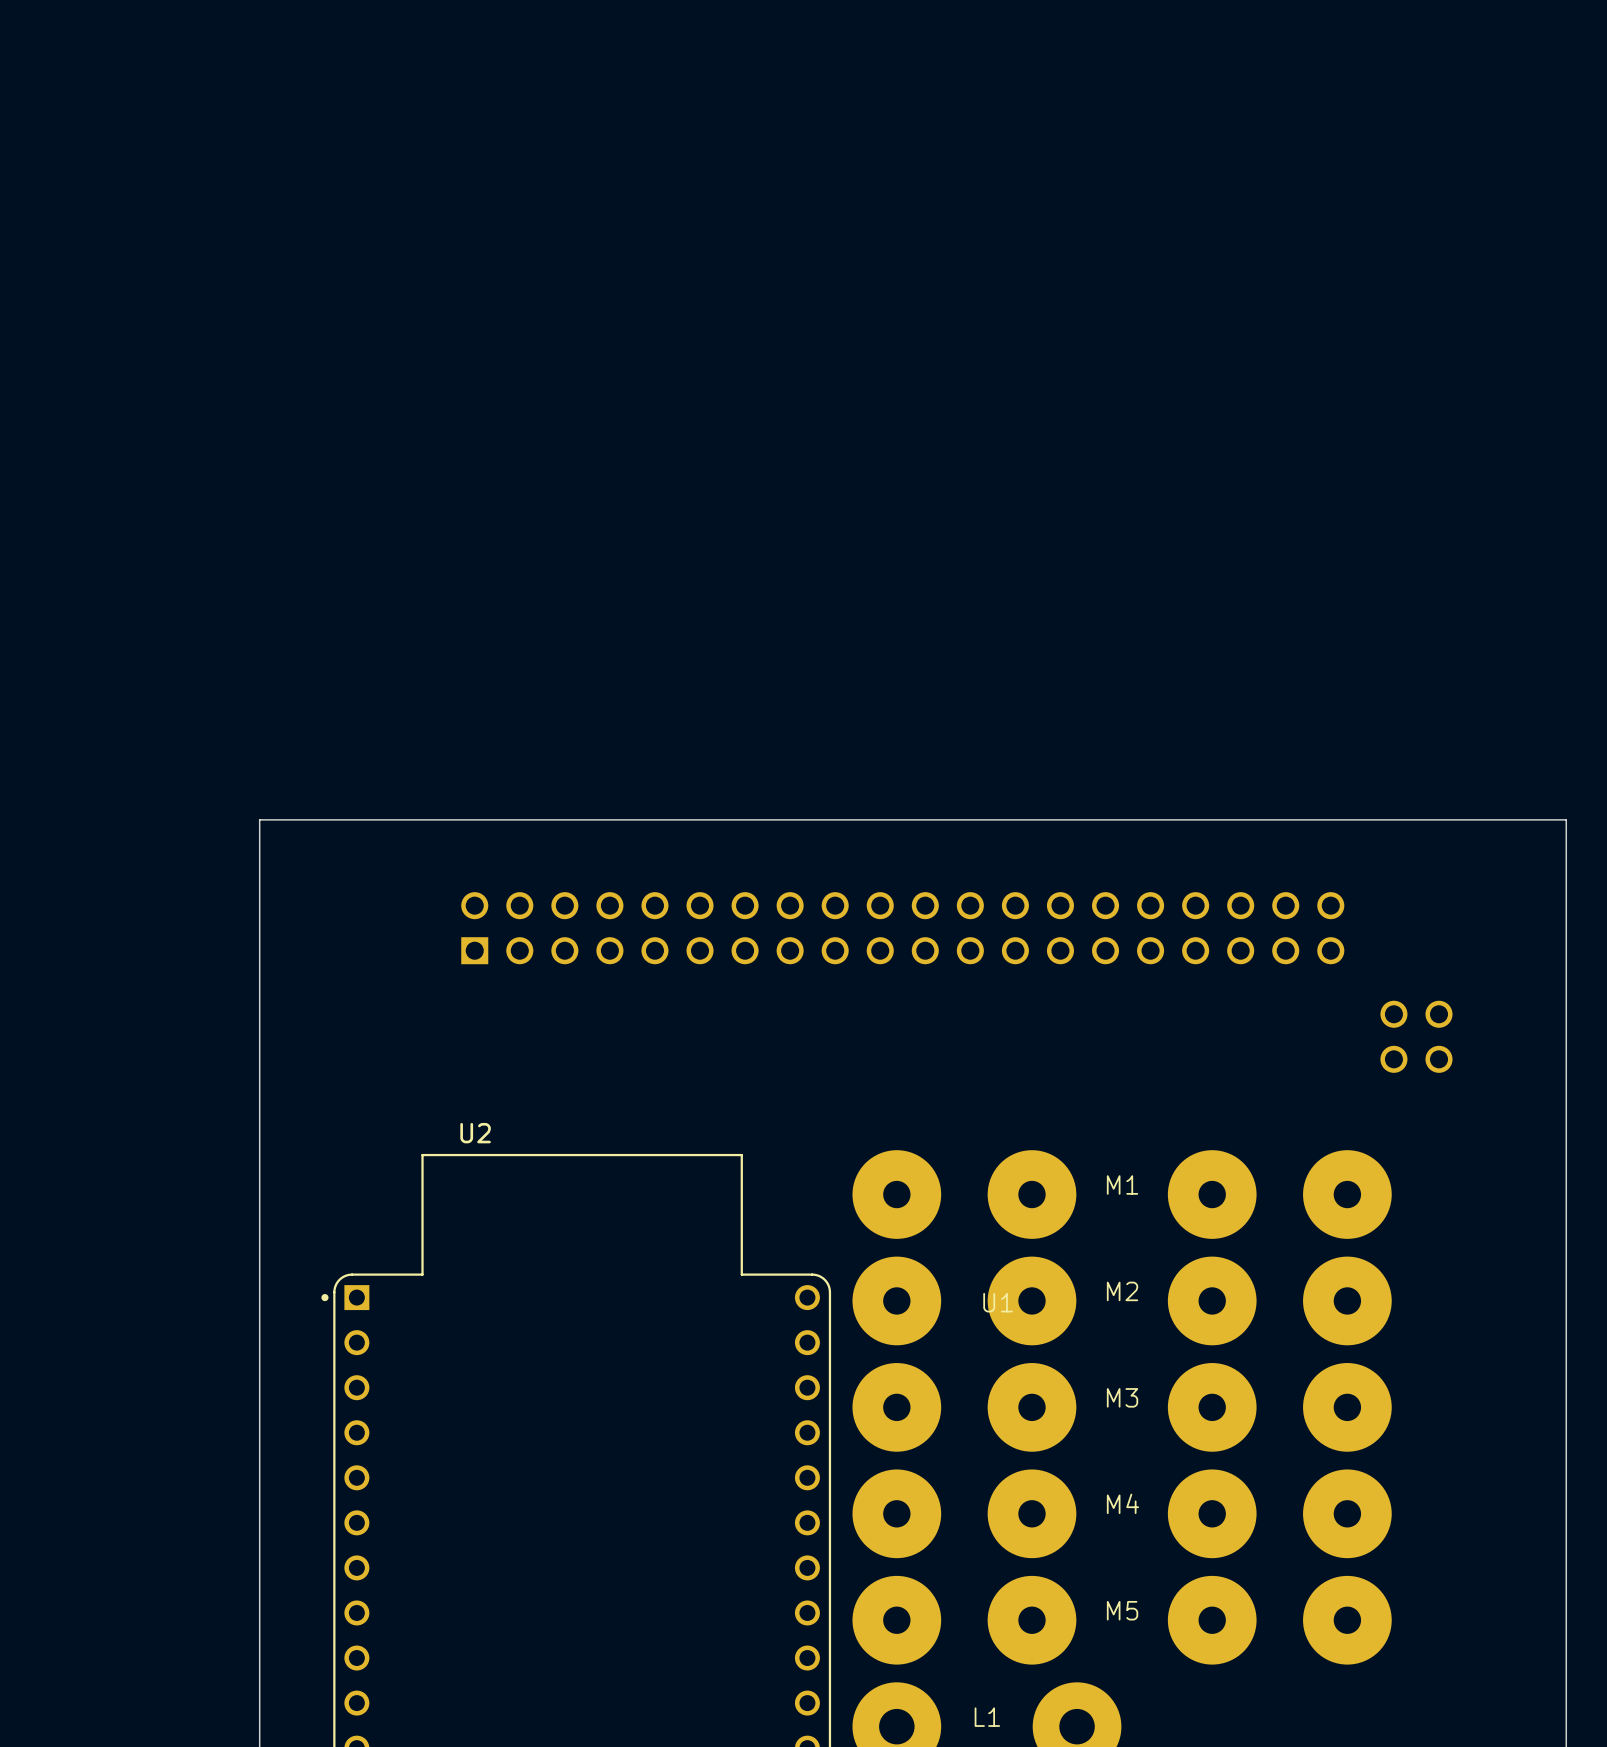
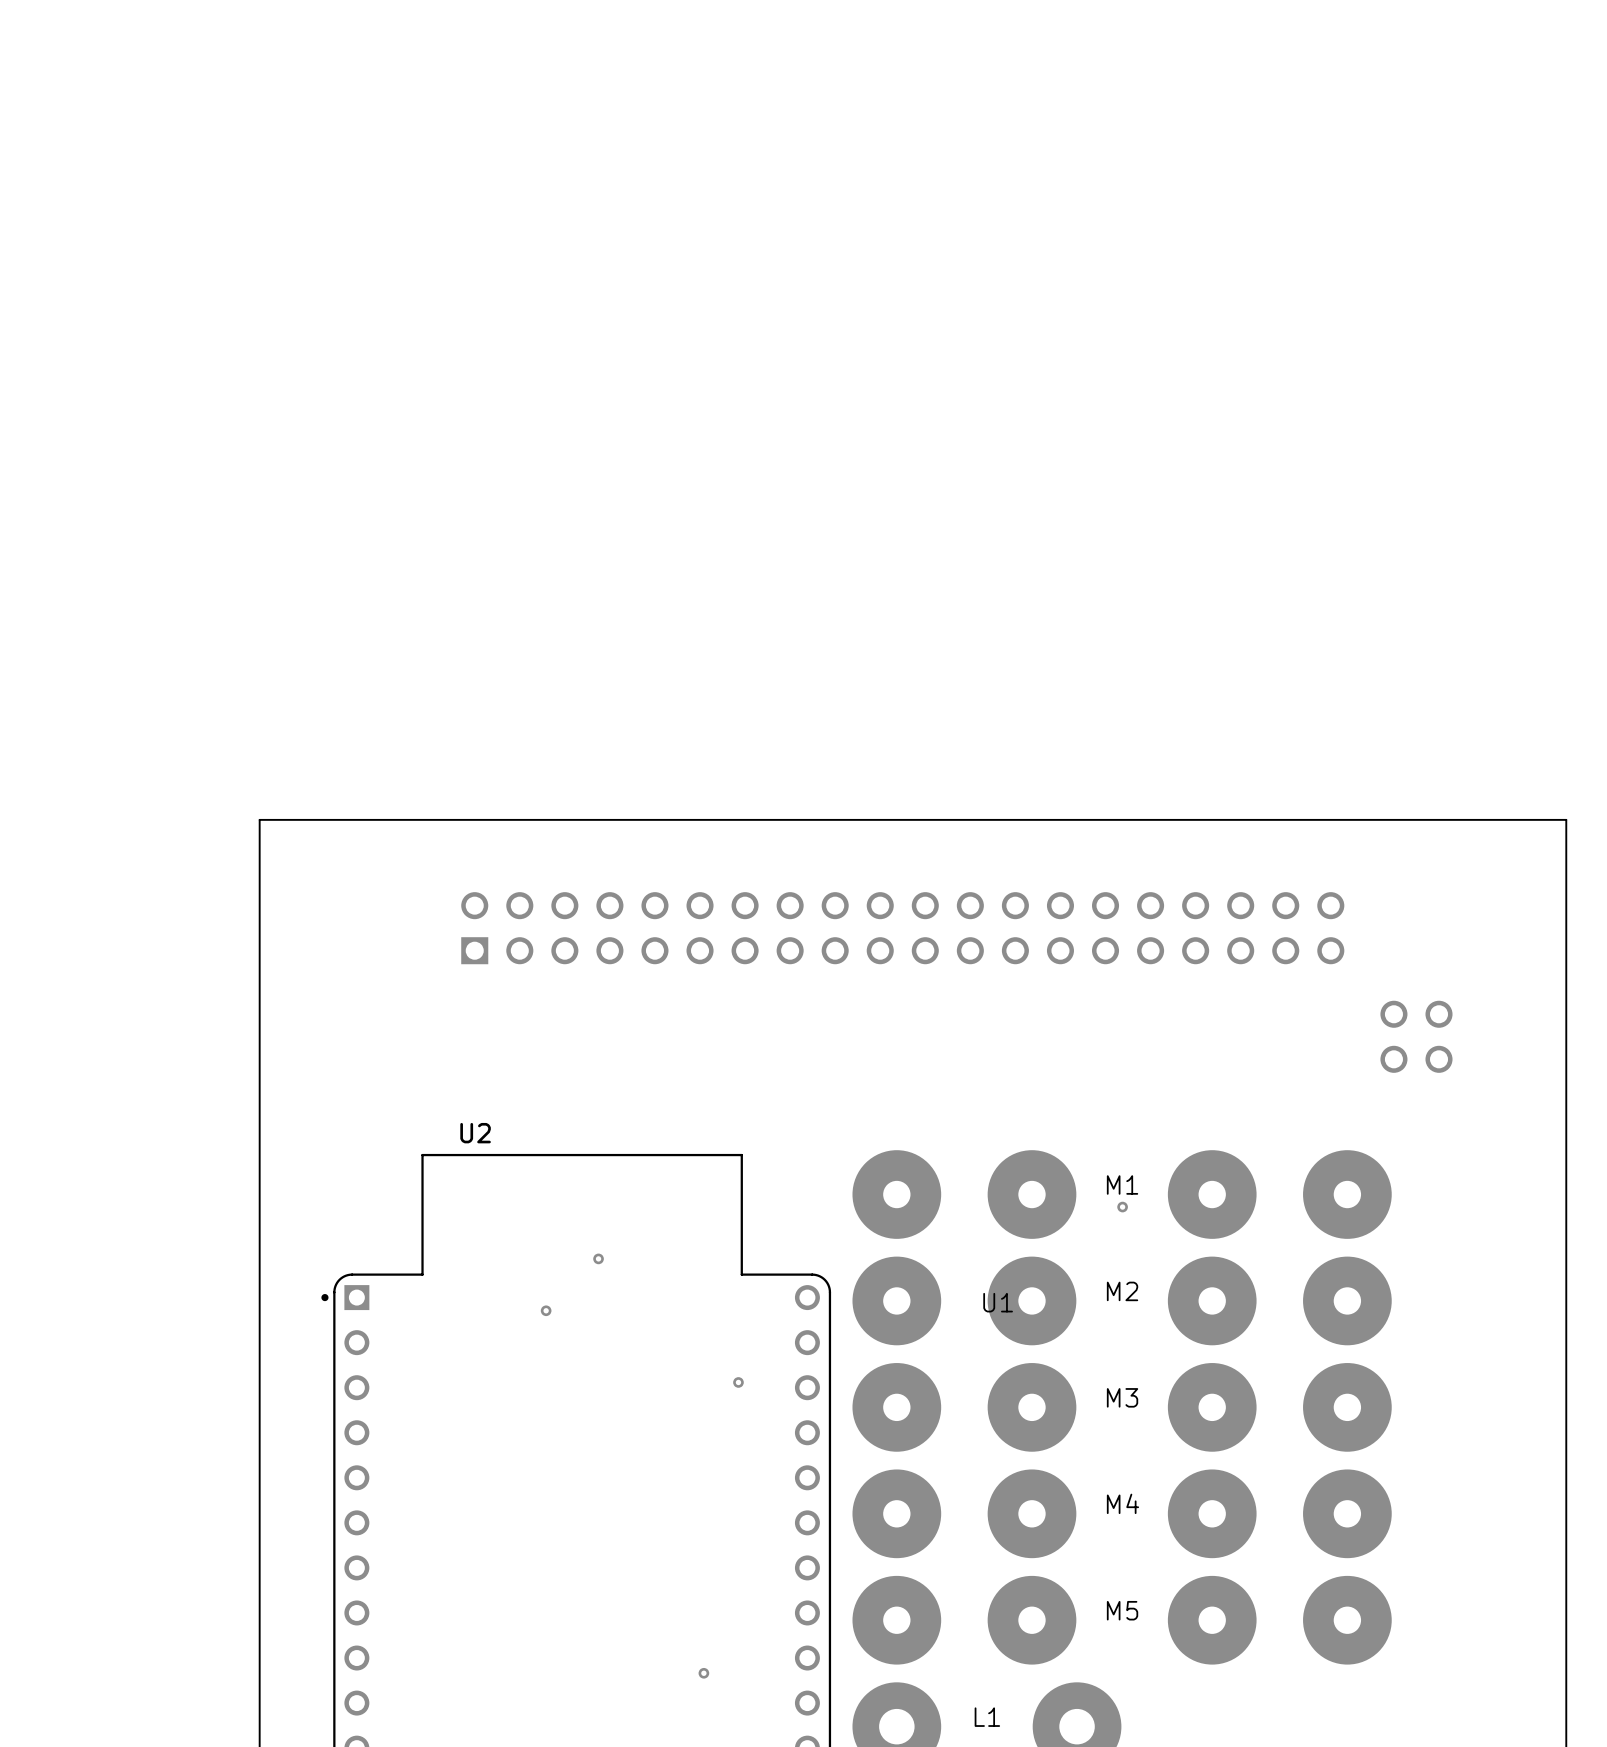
via: none -> (1122, 1207)
via: none -> (598, 1258)
via: none -> (546, 1310)
via: none -> (738, 1382)
via: none -> (703, 1673)

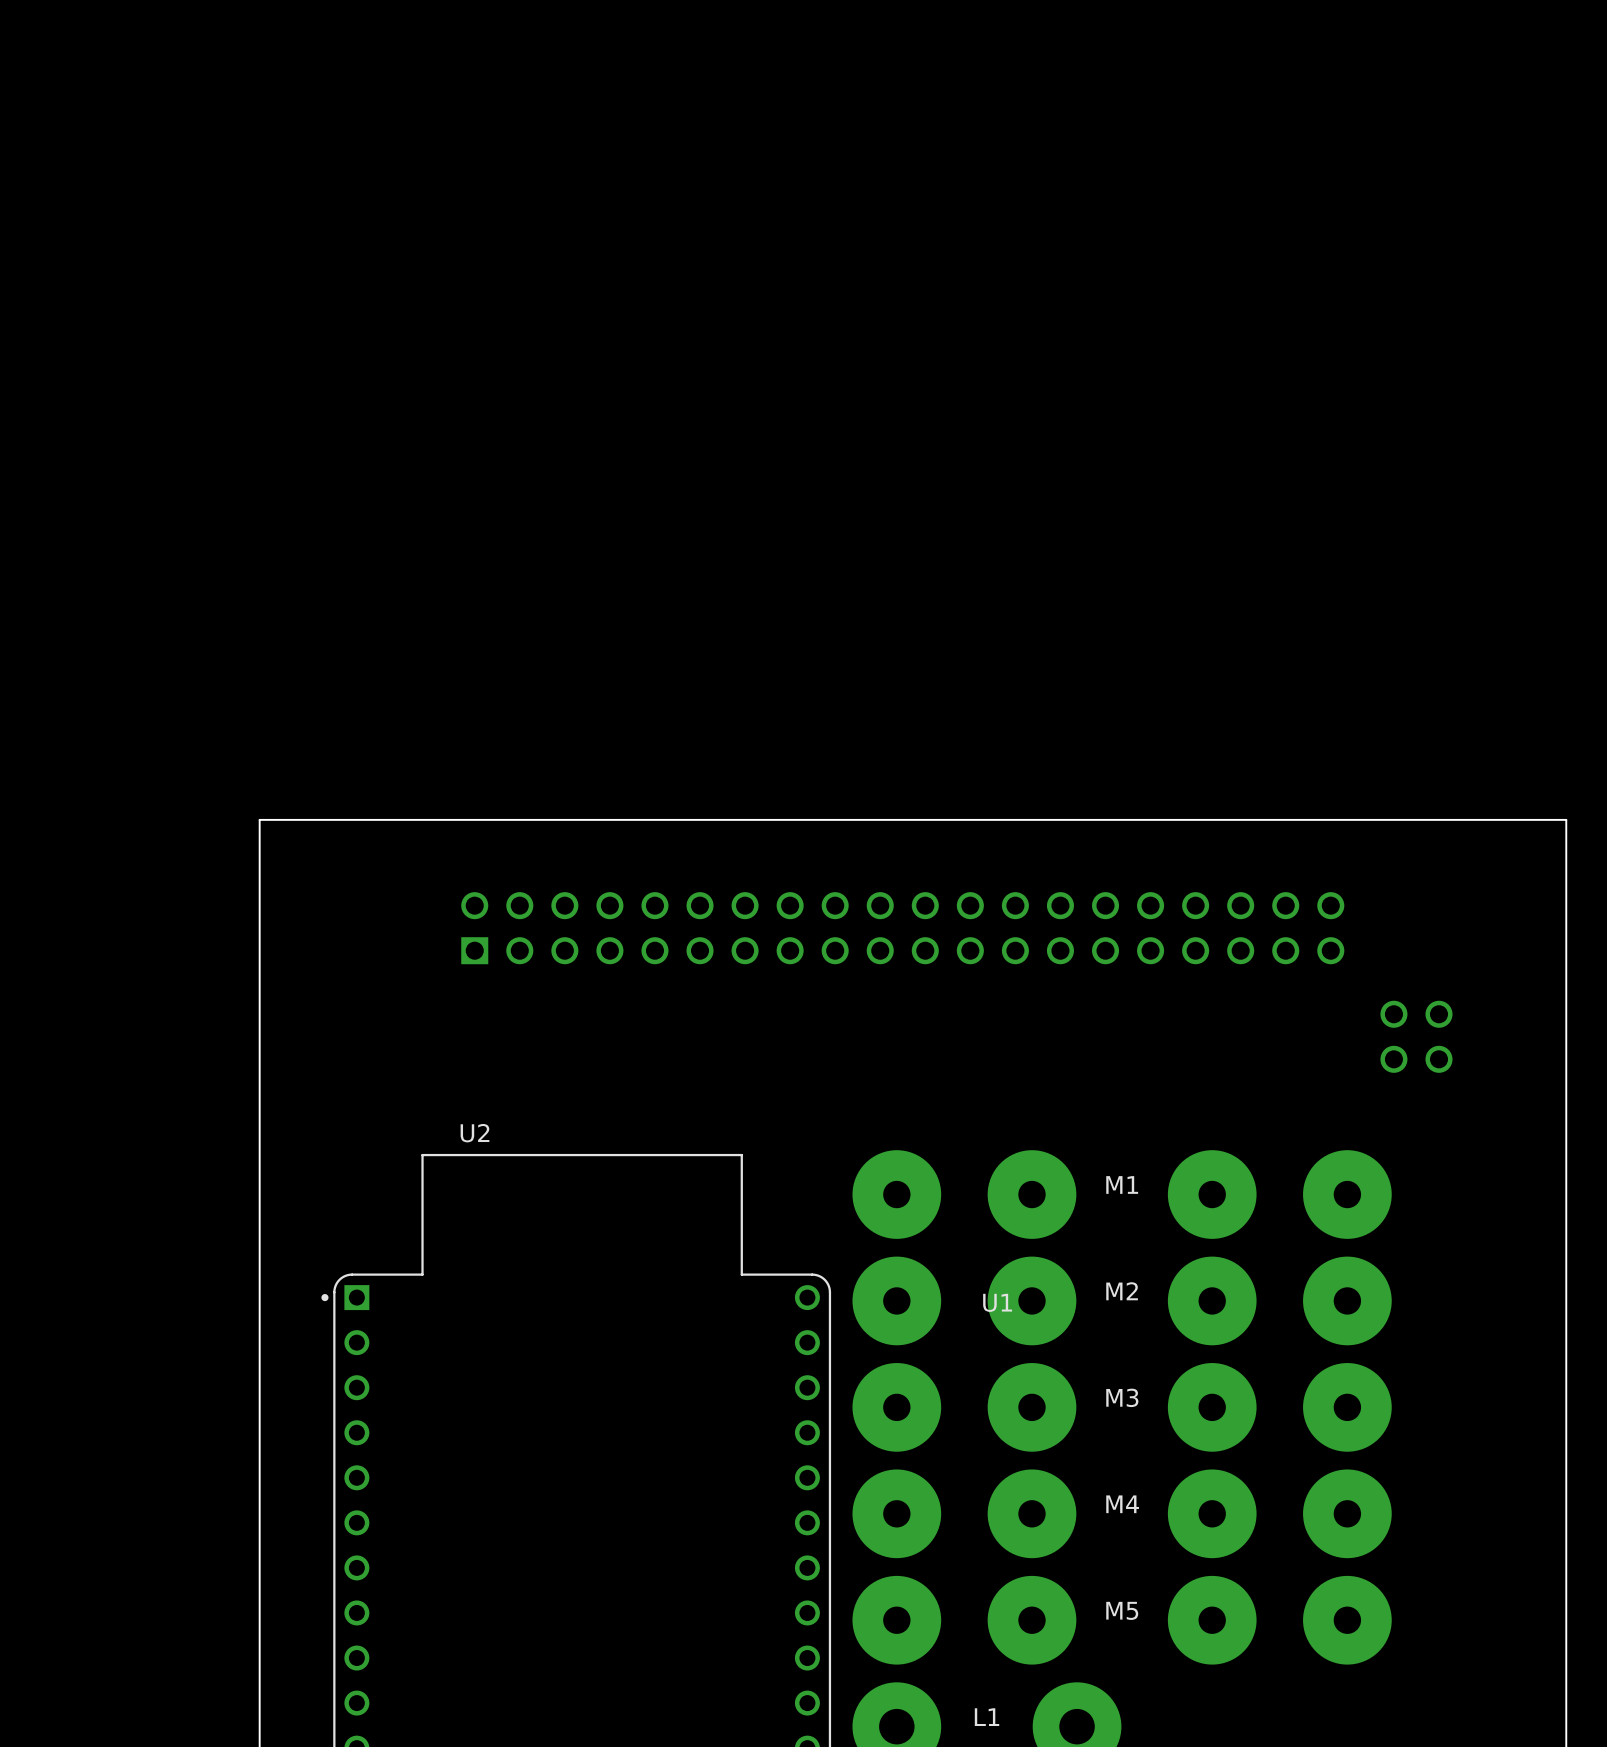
via: (1122, 1207) -> none
via: (598, 1258) -> none
via: (546, 1310) -> none
via: (738, 1382) -> none
via: (703, 1673) -> none

